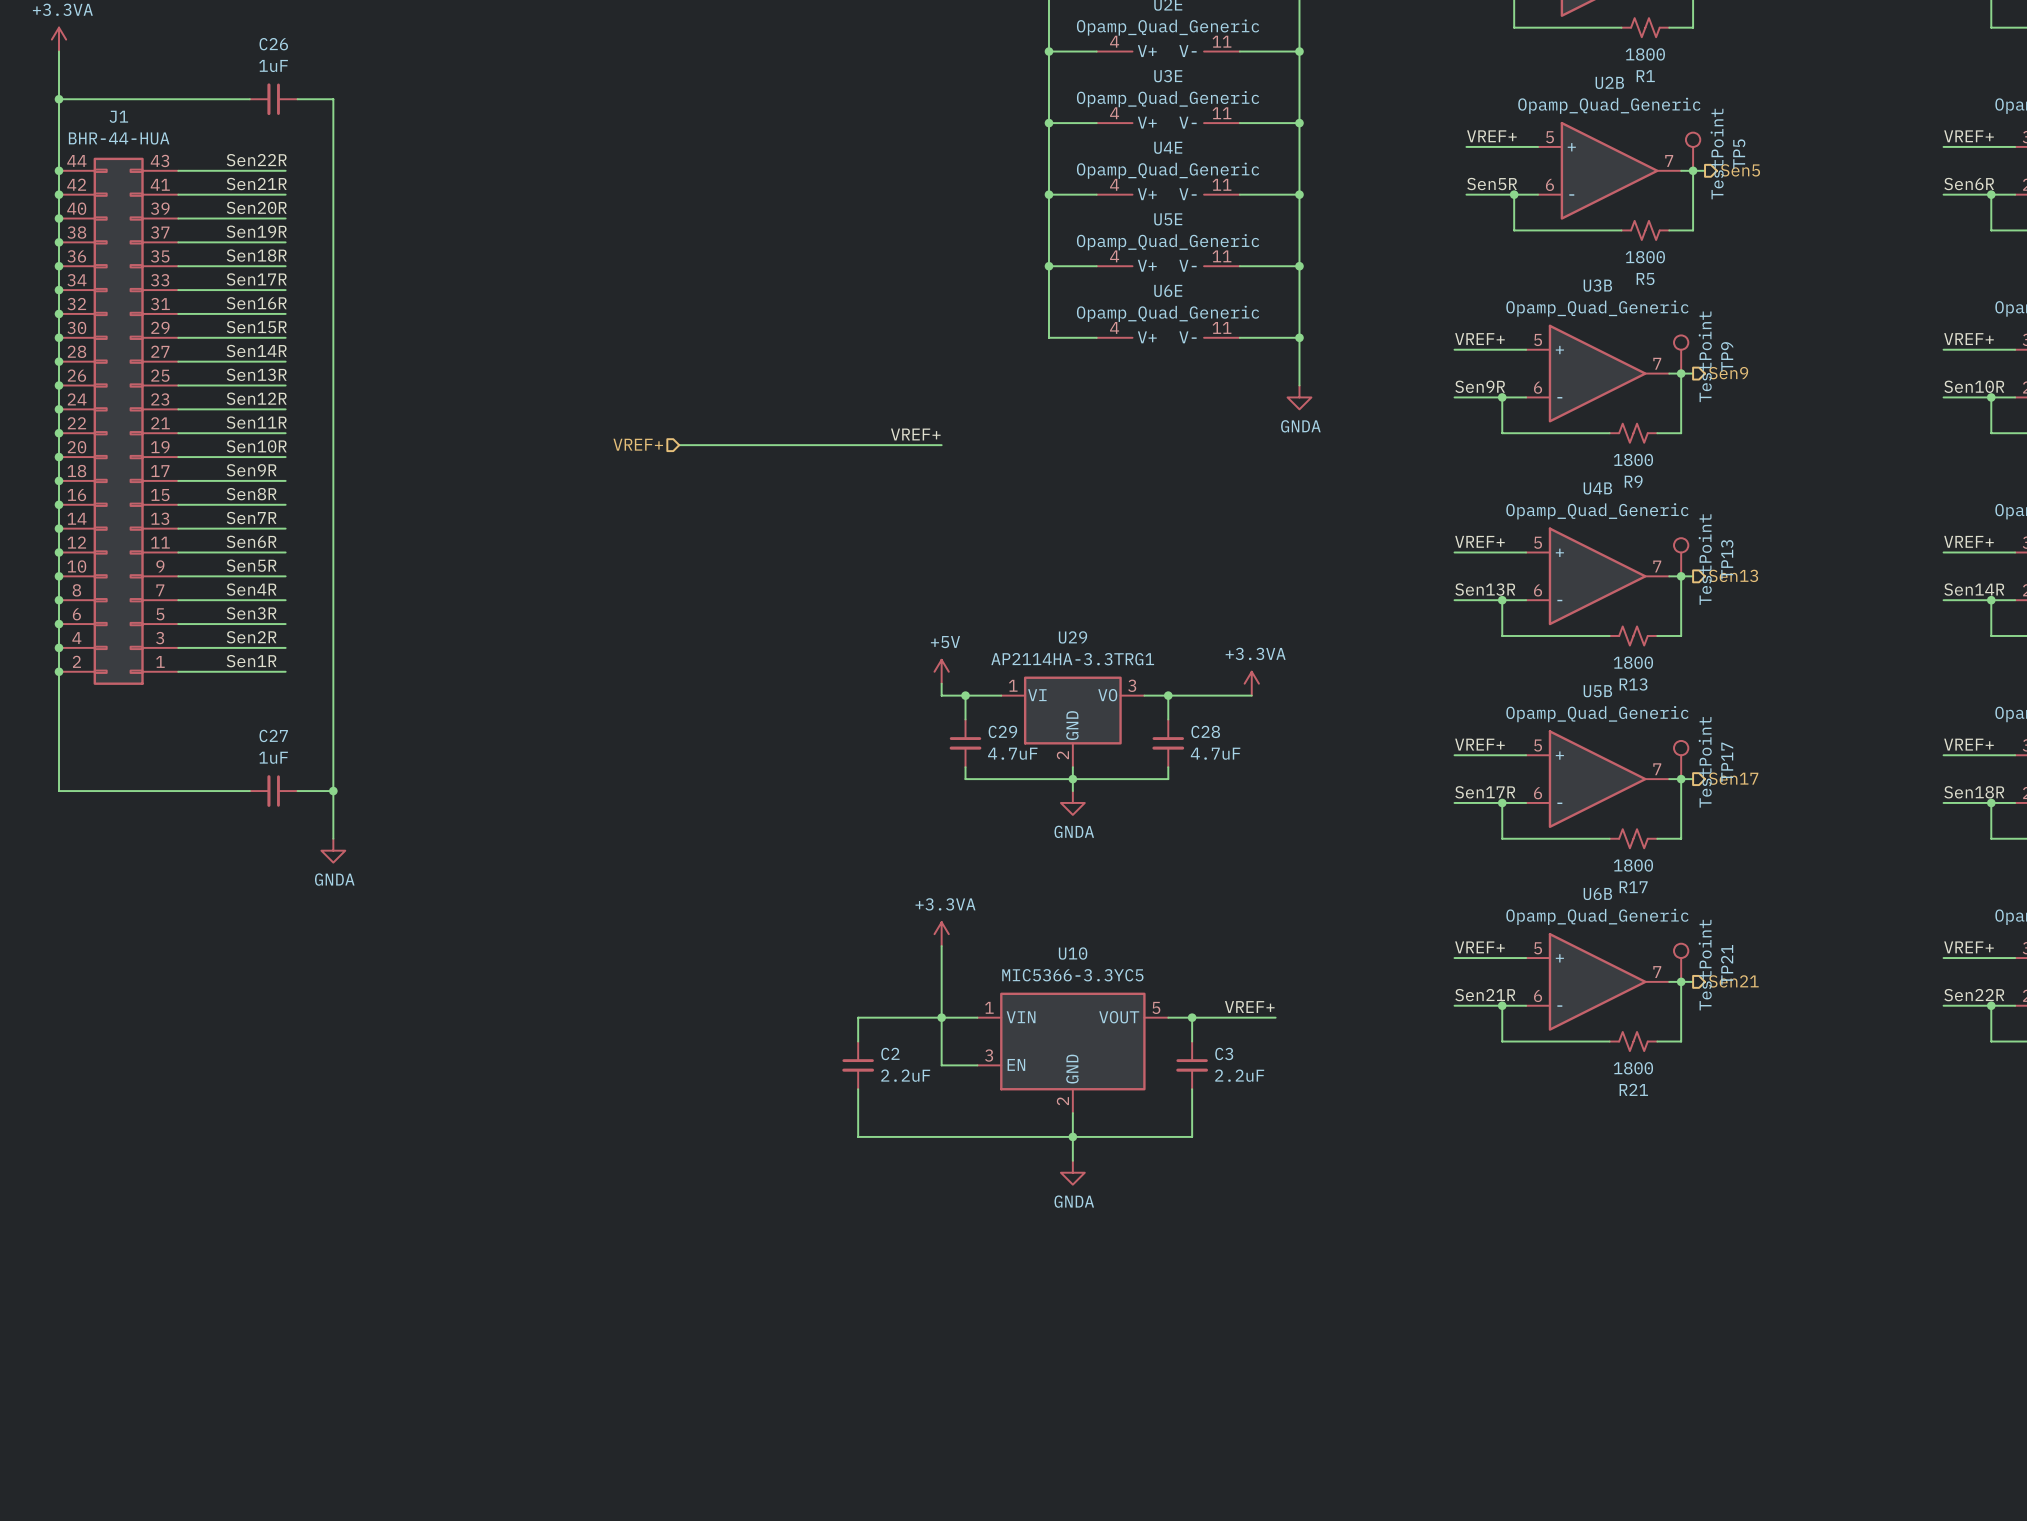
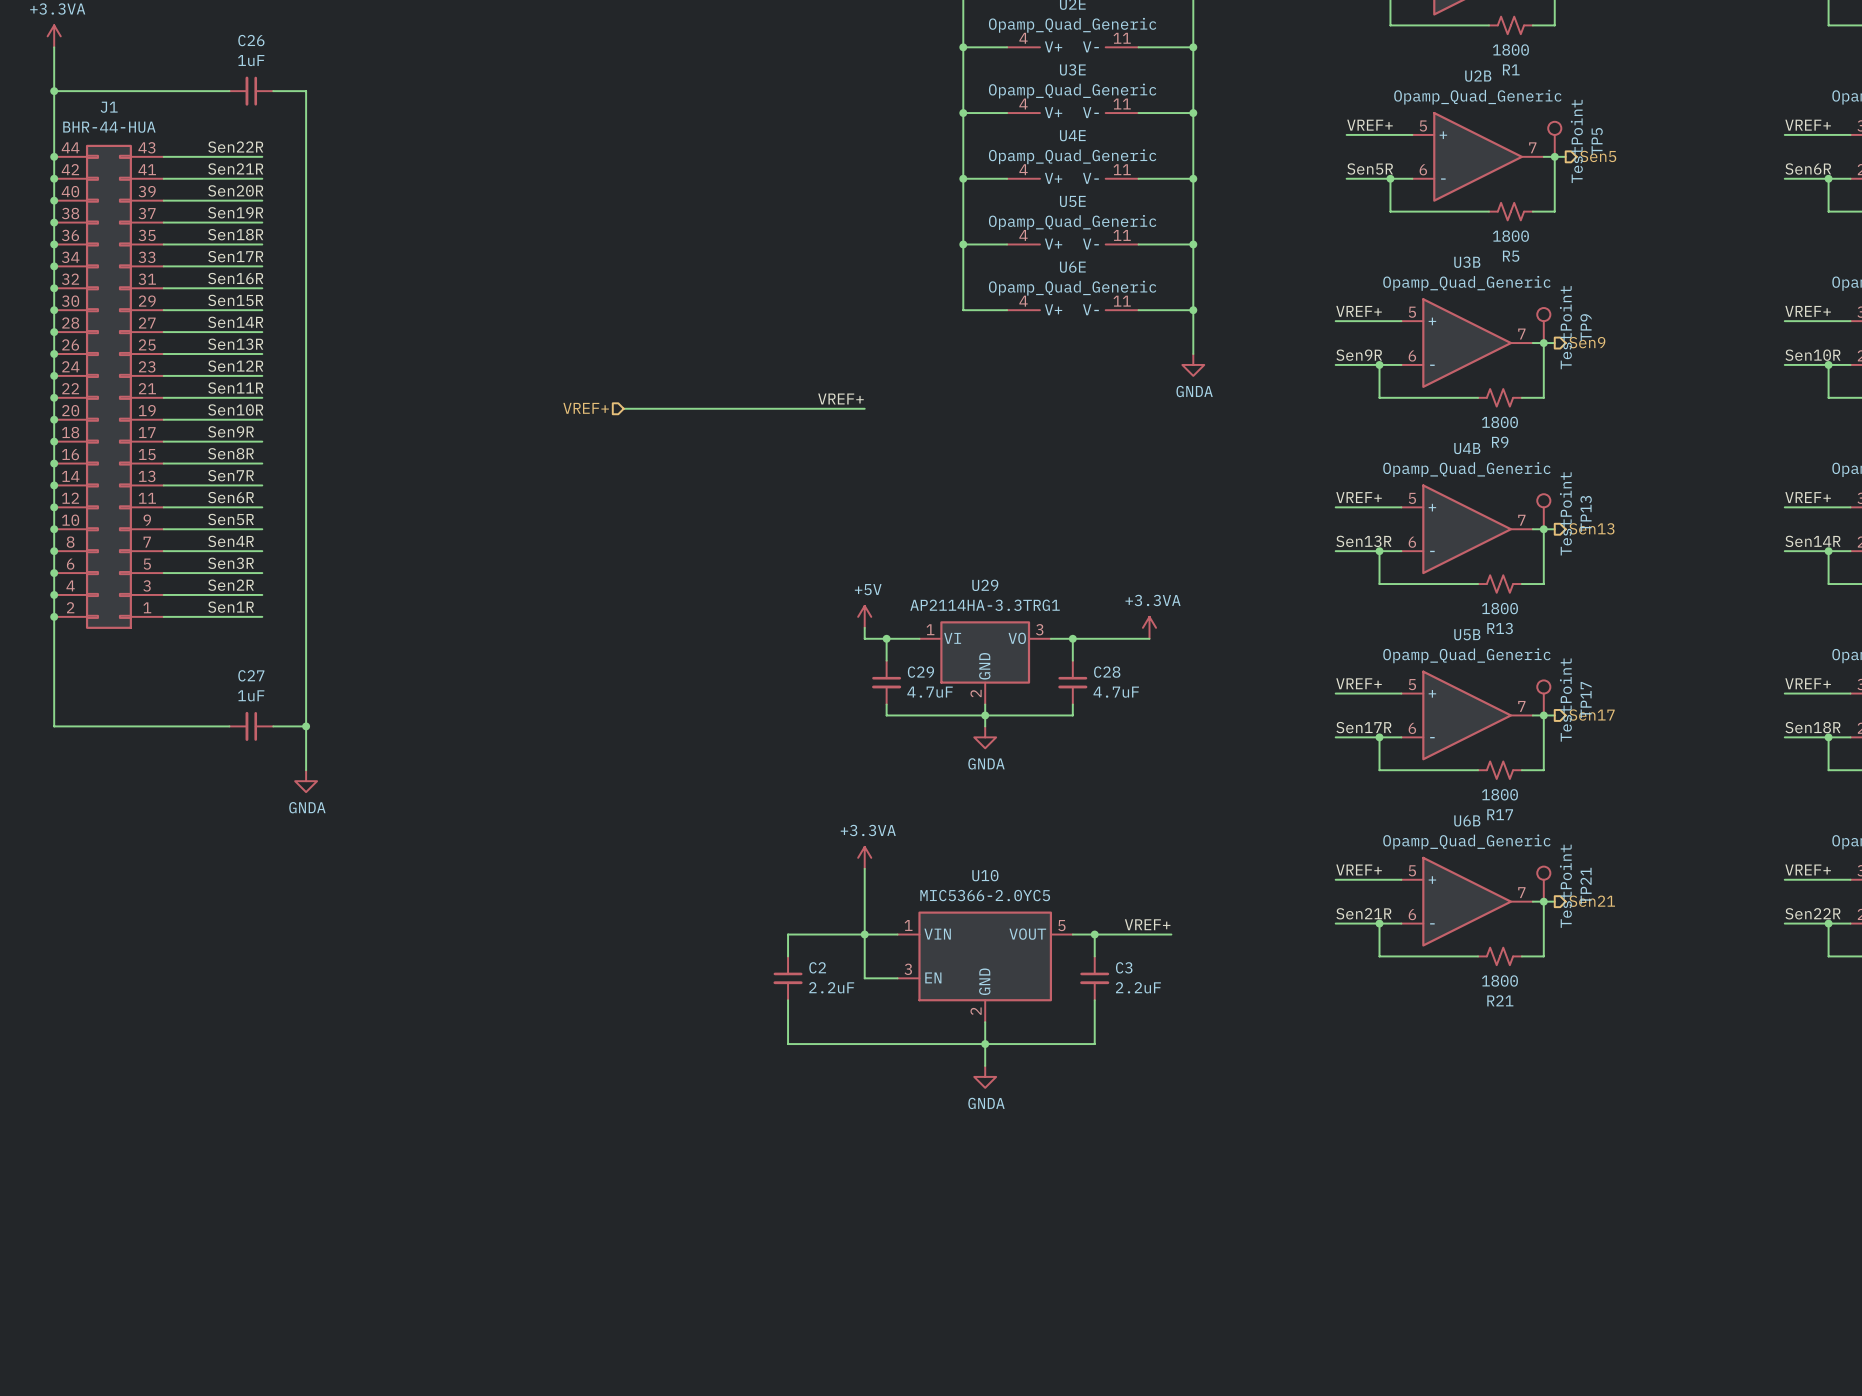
U10 value: MIC5366-3.3YC5 (1072, 975) -> MIC5366-2.0YC5 (985, 895)

